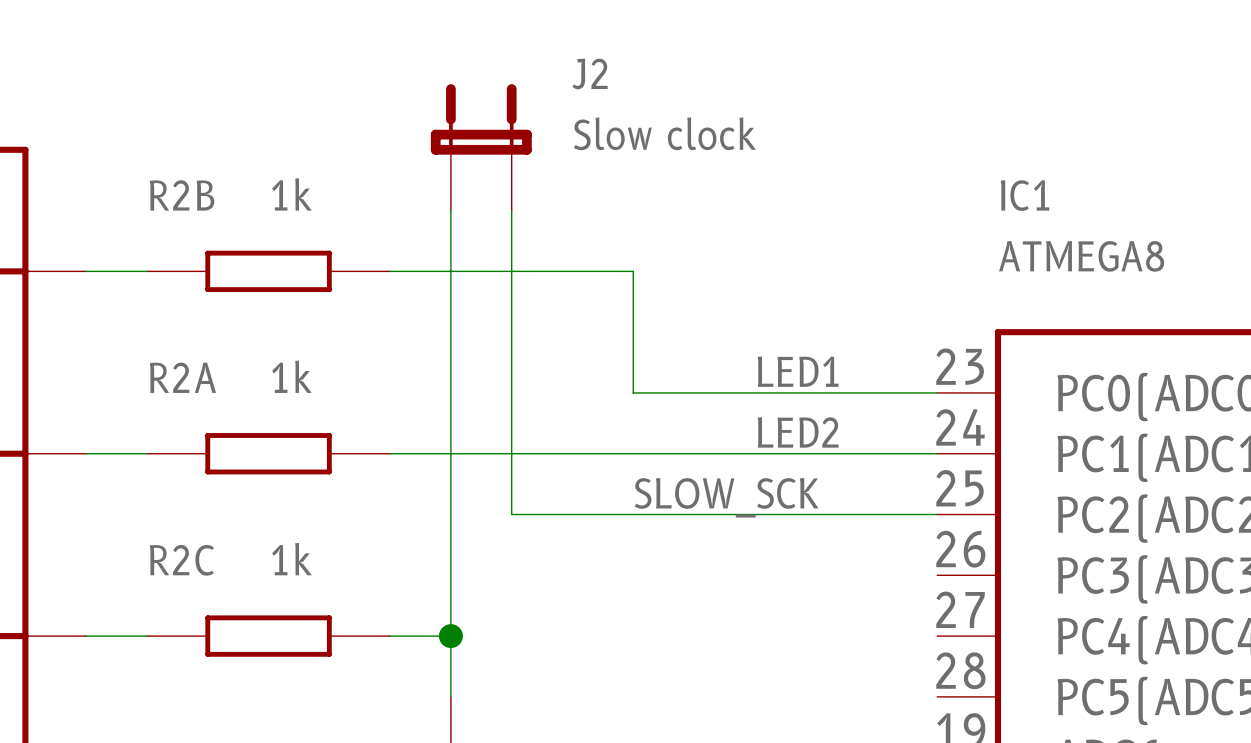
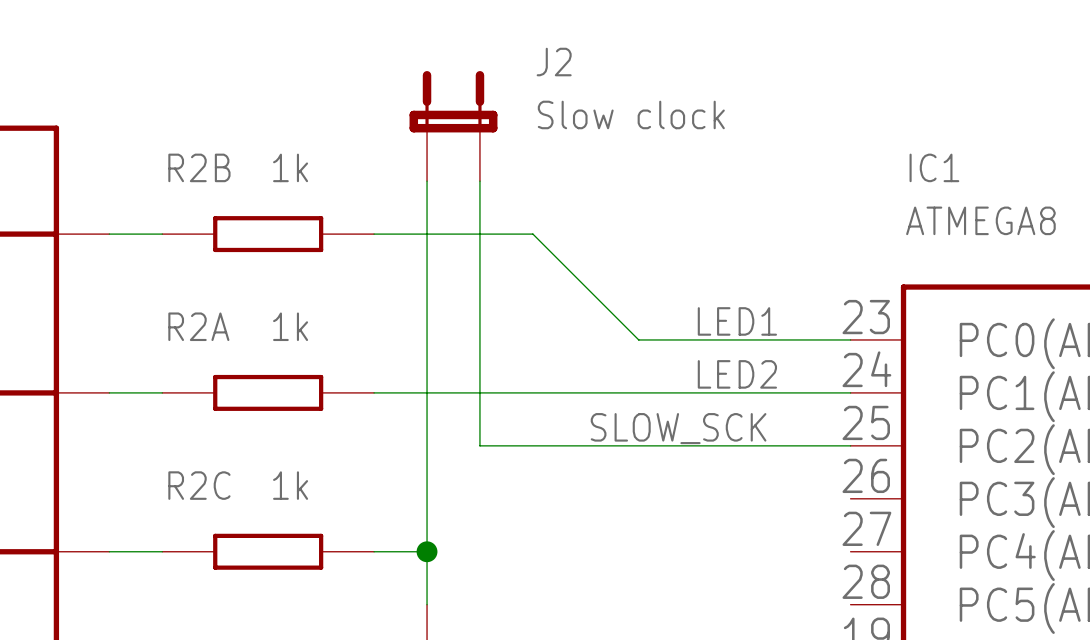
wire: (572, 271) (633, 271) (633, 392) (694, 392) -> (532, 234) (638, 339)

